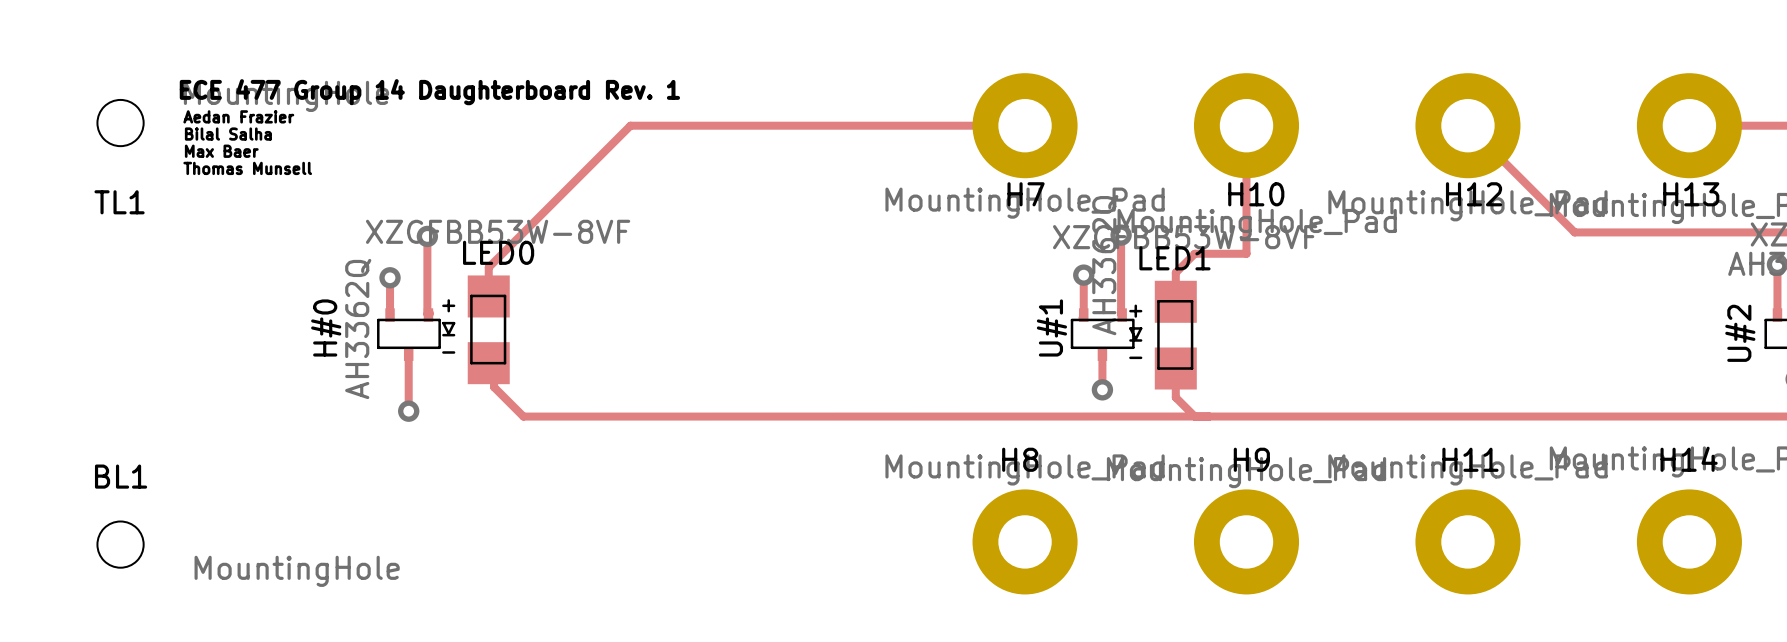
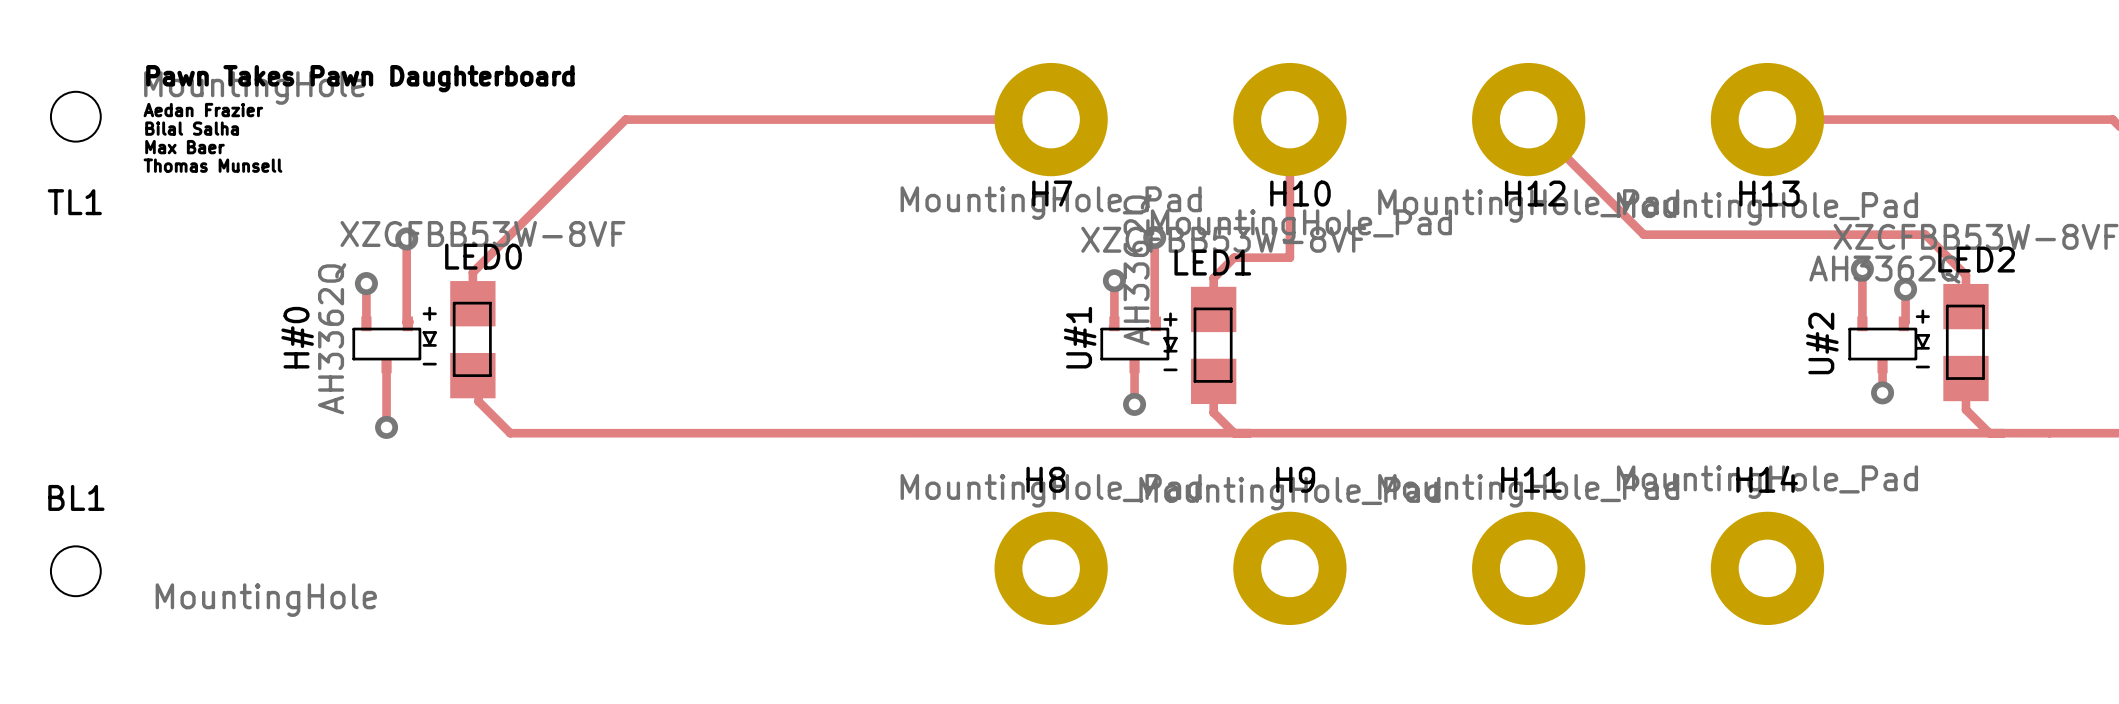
text: none -> Pawn Takes Pawn Daughterboard (360, 78)
text: ECE 477 Group 14 Daughterboard Rev. 1 (429, 92) -> none

